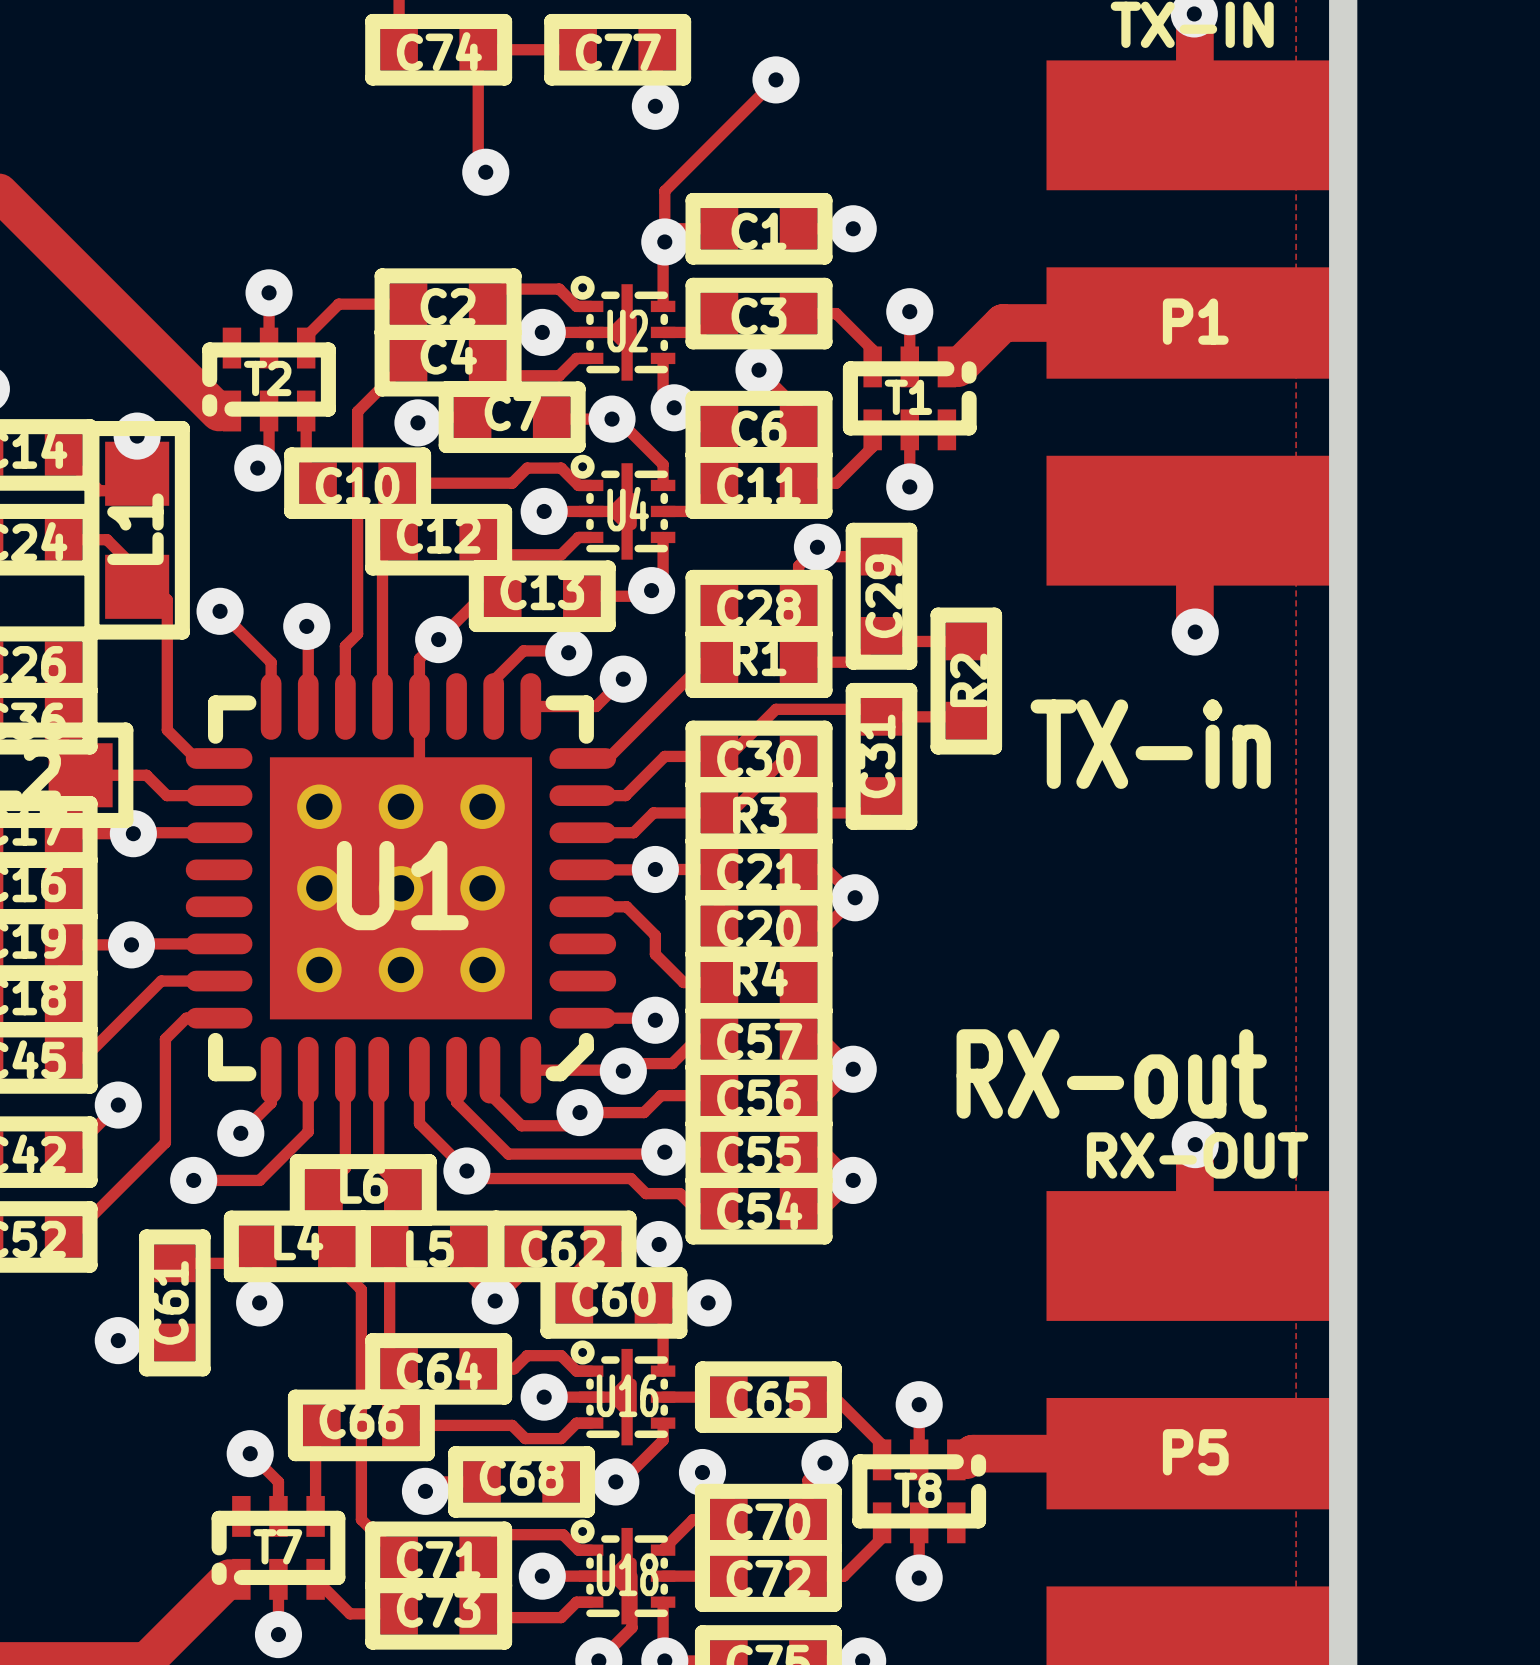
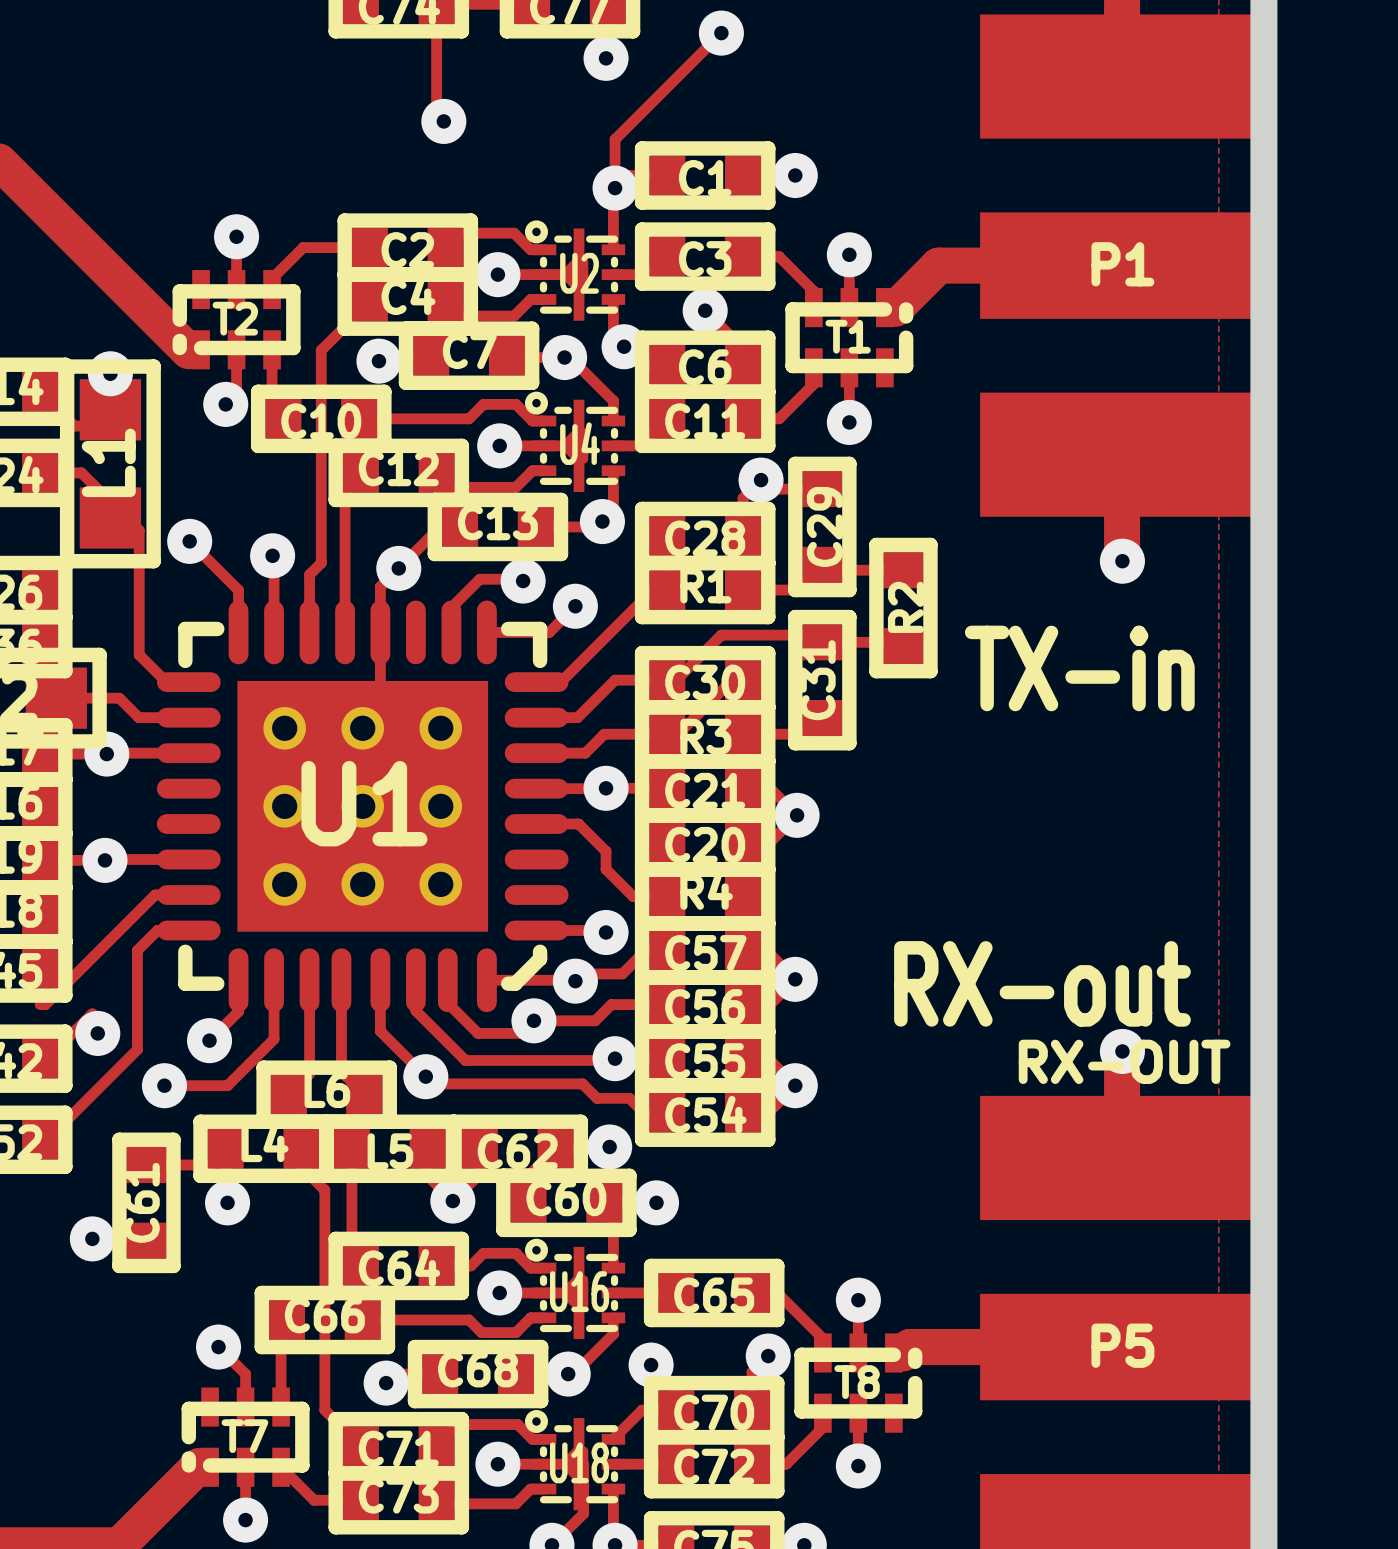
track: (183, 981) (161, 981) (84, 1057) (63, 1057) -> (155, 895) (45, 1004) (40, 1004)
via position: (118, 1105) -> (97, 1033)

